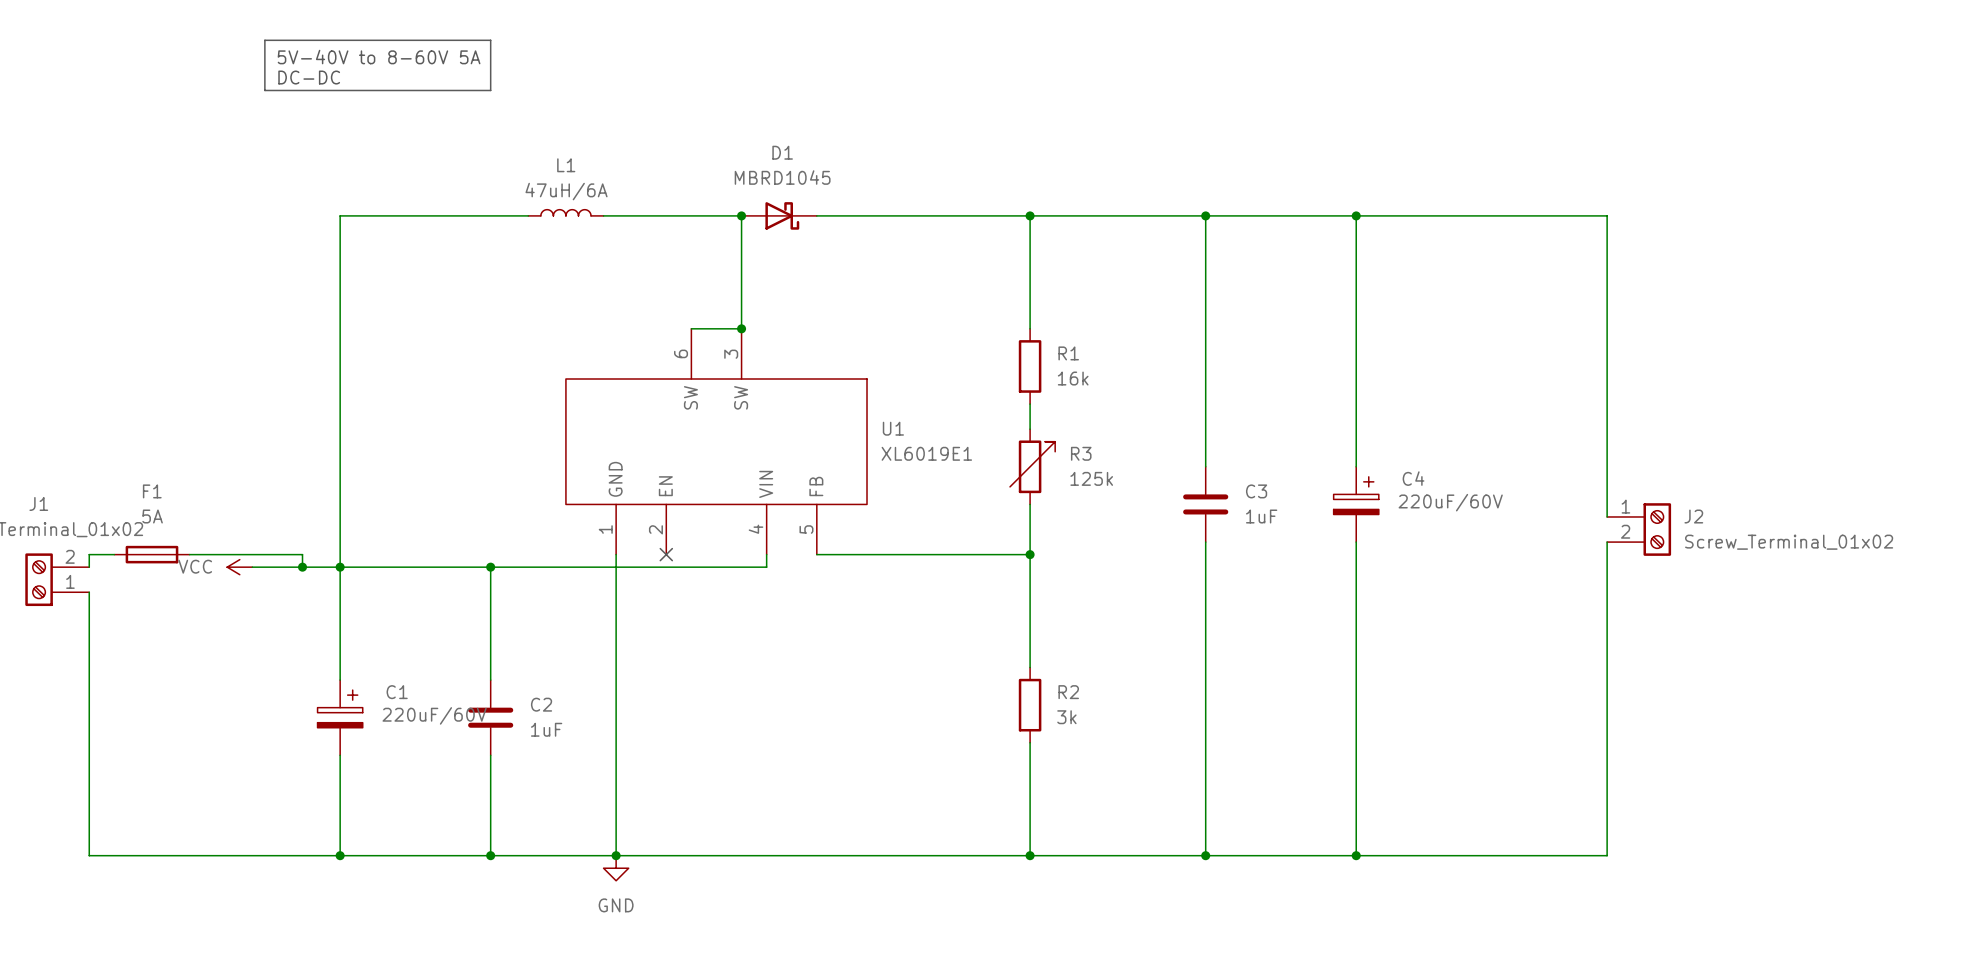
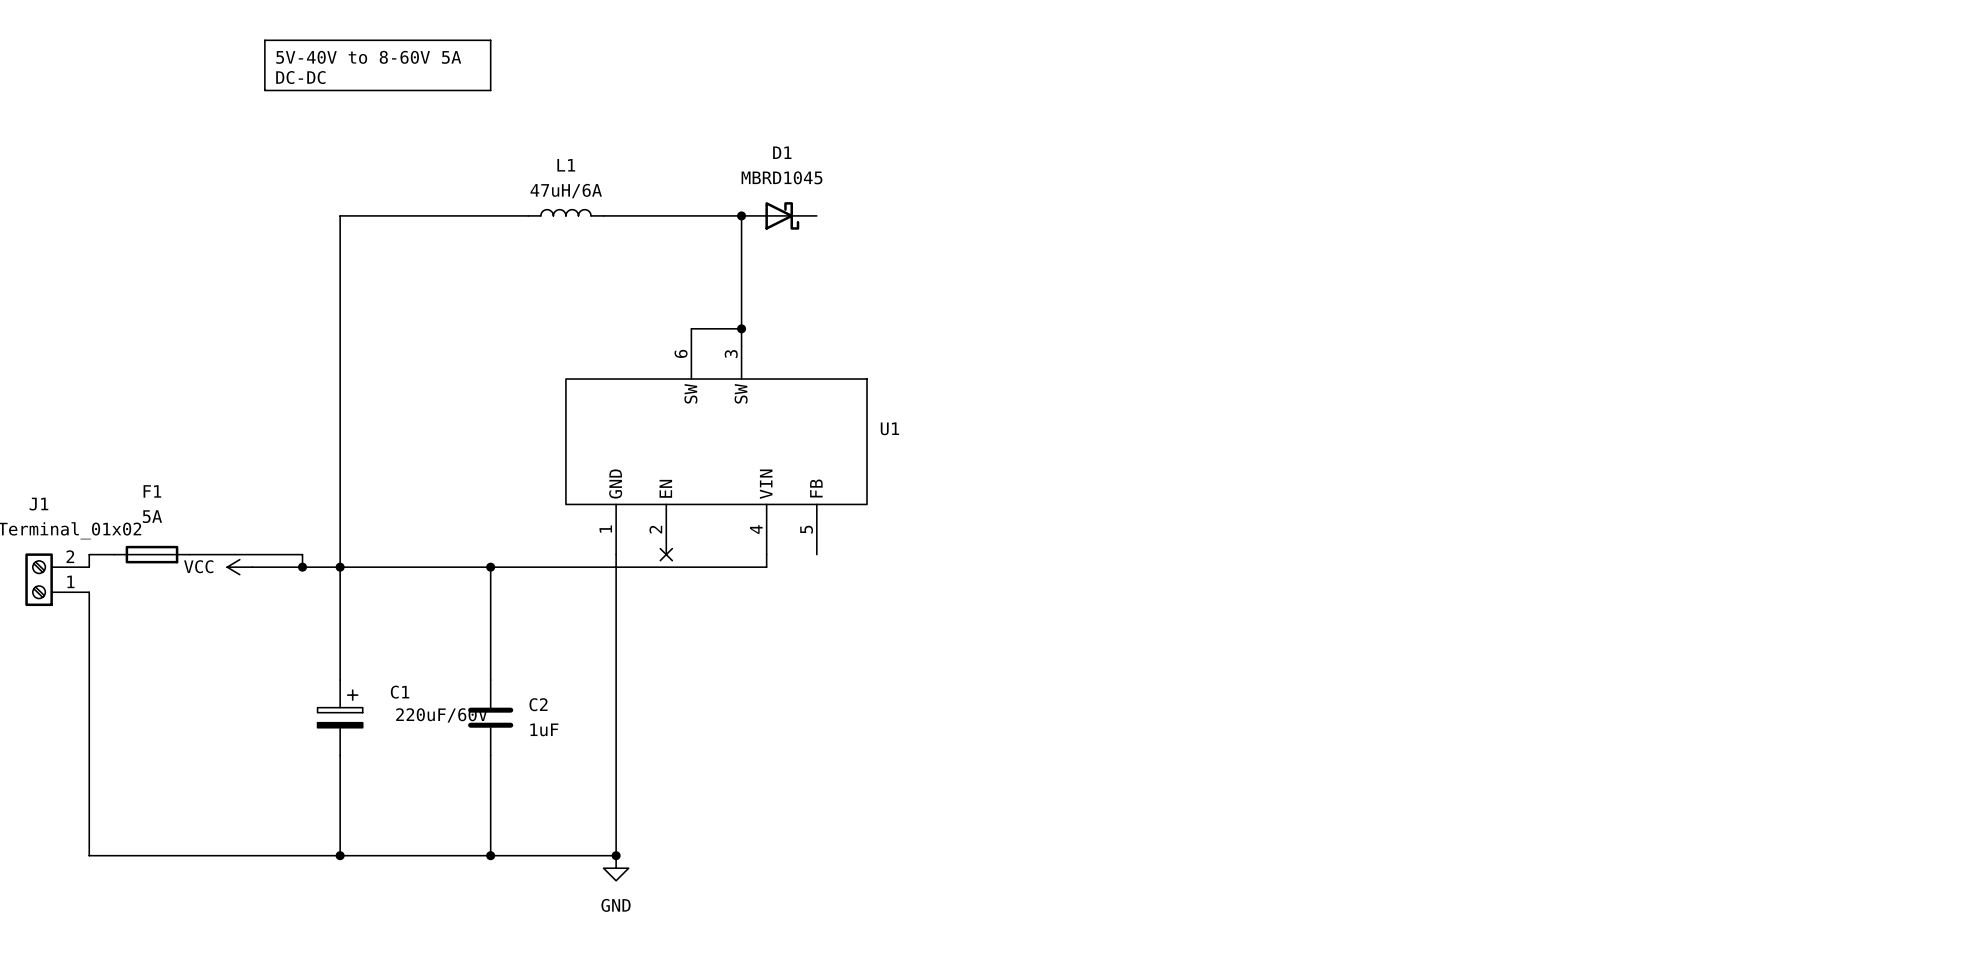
wire: (816, 215) (1607, 215) (1607, 516) -> none
wire: (1030, 215) (1030, 328) -> none
junction: (1030, 215) -> none
wire: (1205, 215) (1205, 466) -> none
junction: (1205, 215) -> none
wire: (1356, 215) (1356, 466) -> none
junction: (1356, 215) -> none
R1: 16k (1030, 366) -> none
wire: (1030, 404) (1030, 429) -> none
U1 value: XL6019E1 (926, 453) -> none
R3: 125k (1032, 466) -> none
wire: (1030, 504) (1030, 667) -> none
C3: 1uF (1205, 504) -> none
C4: 220uF/60V (1356, 504) -> none
J2: Screw_Terminal_01x02 (1639, 529) -> none
wire: (1205, 542) (1205, 855) -> none
wire: (1356, 542) (1356, 855) -> none
wire: (1607, 542) (1607, 855) (616, 855) -> none
wire: (816, 554) (1030, 554) -> none
junction: (1030, 554) -> none
R2: 3k (1030, 705) -> none
wire: (1030, 742) (1030, 855) -> none
junction: (1030, 855) -> none
junction: (1205, 855) -> none
junction: (1356, 855) -> none

